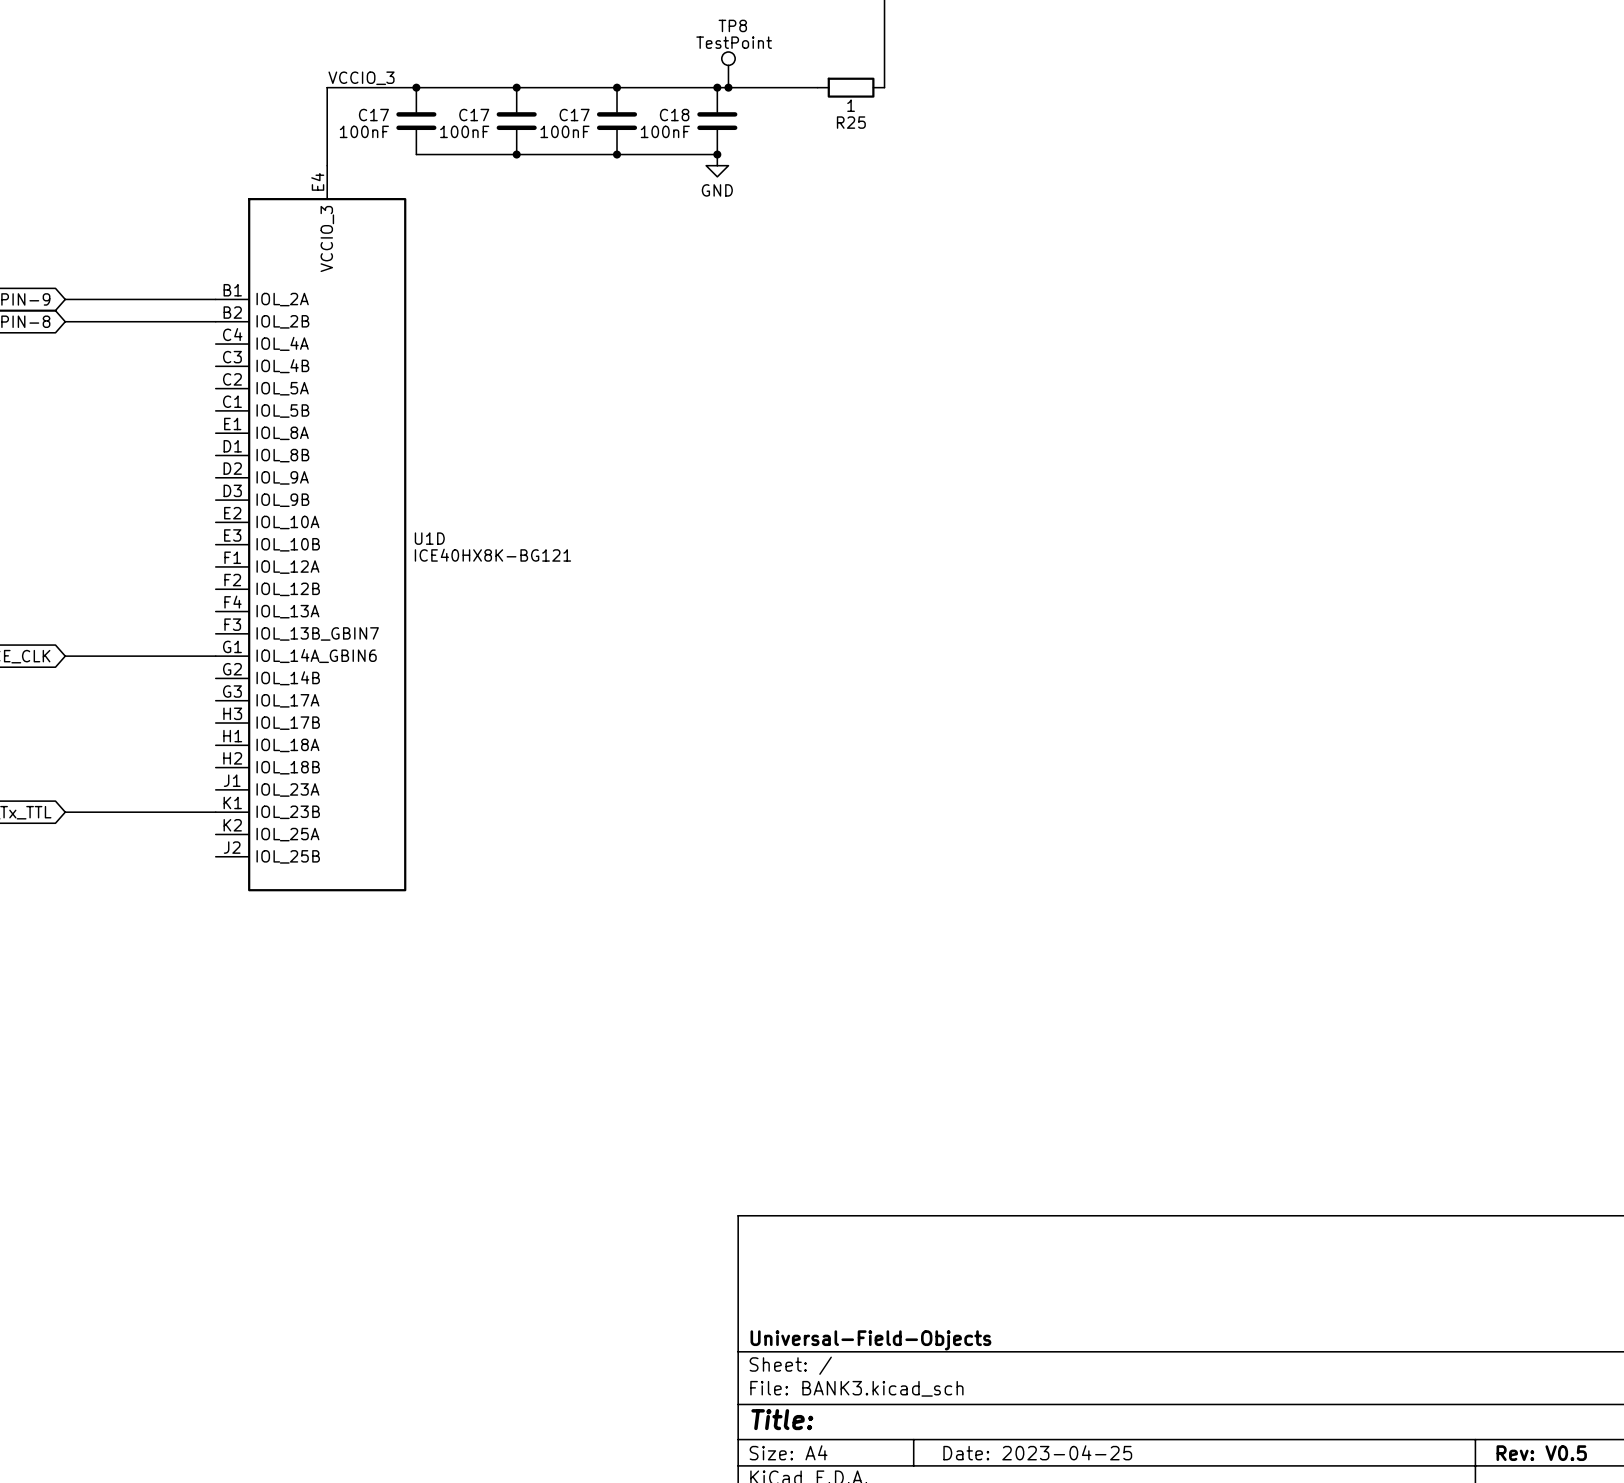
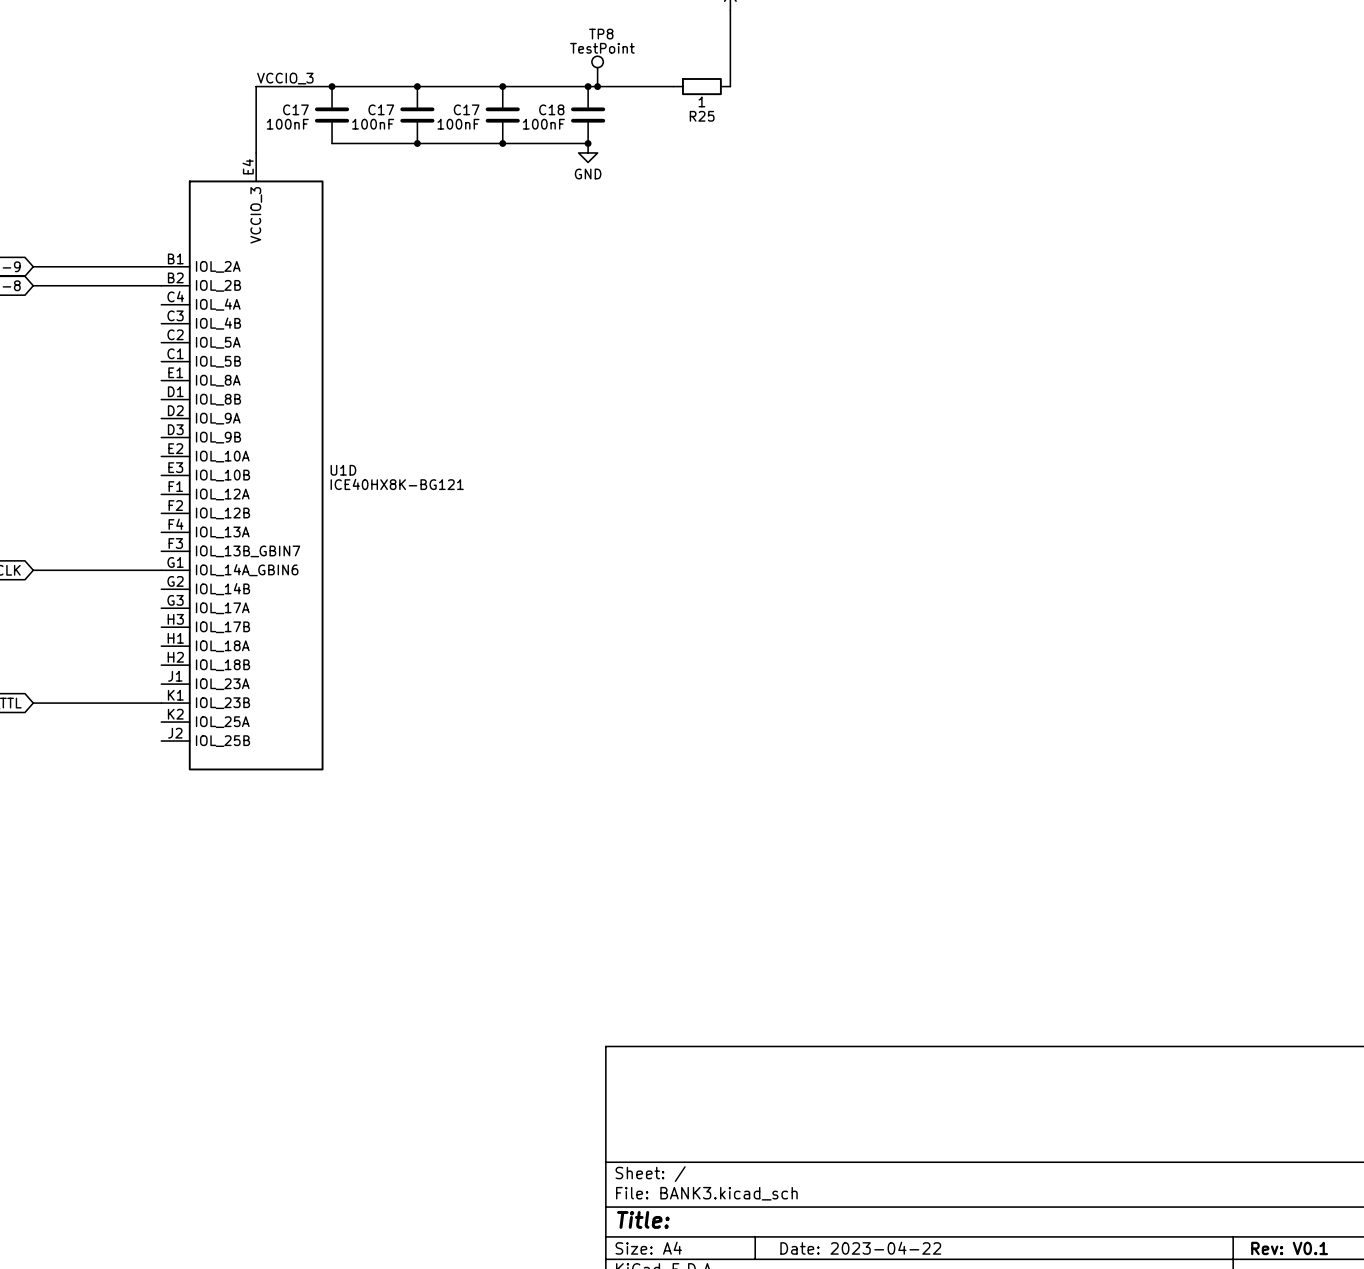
title block: Universal-Field-Objects (870, 1340) -> none
title block: Date: 2023-04-25 (1037, 1452) -> Date: 2023-04-22 (860, 1248)
title block: Rev: V0.5 (1541, 1453) -> Rev: V0.1 (1289, 1248)

